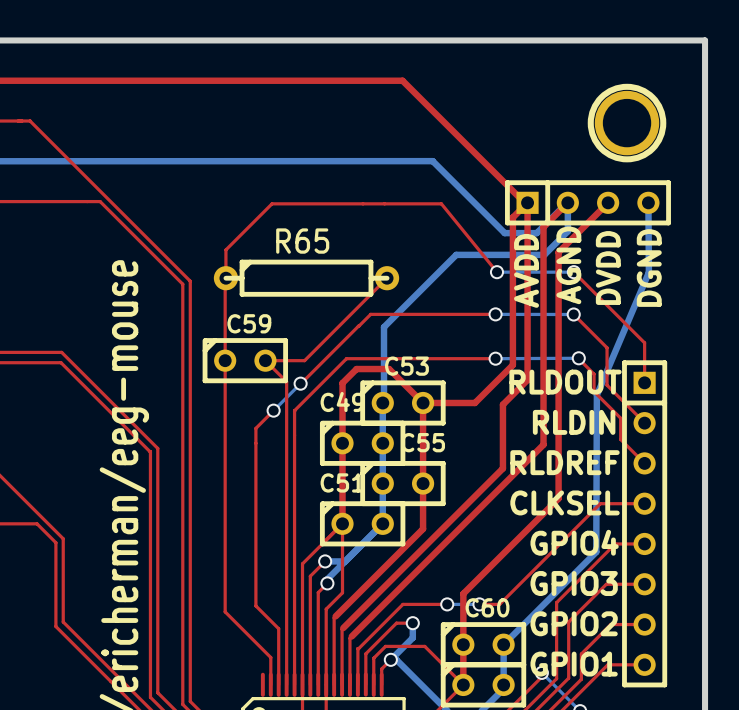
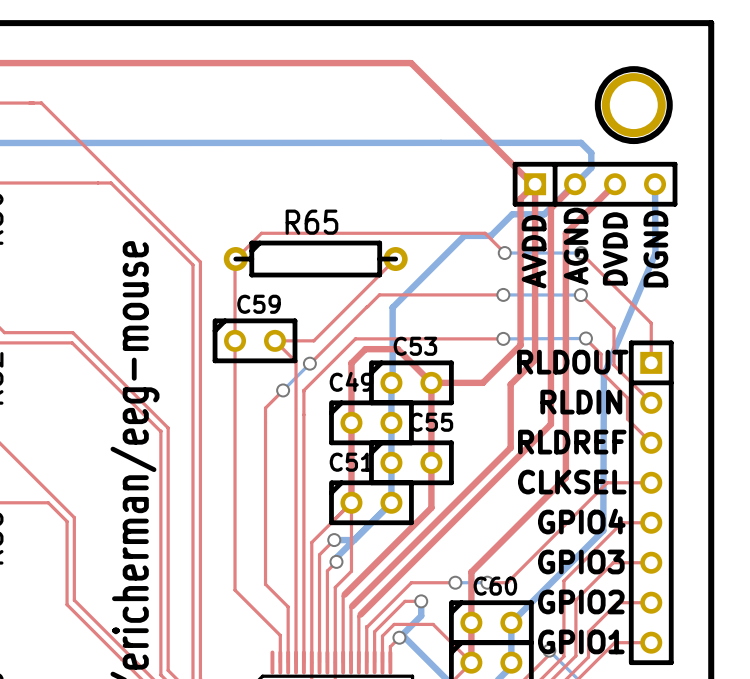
bottom track: (432, 161) (504, 233) -> (441, 142) (581, 142) (591, 153) (591, 168) (575, 184)
bottom track: (567, 202) (567, 231) (544, 254) (482, 254) -> (512, 214) (490, 235)
top track: (496, 272) (441, 203) (272, 203) (225, 249) (225, 278) -> (504, 253) (485, 233) (261, 233) (235, 259)

